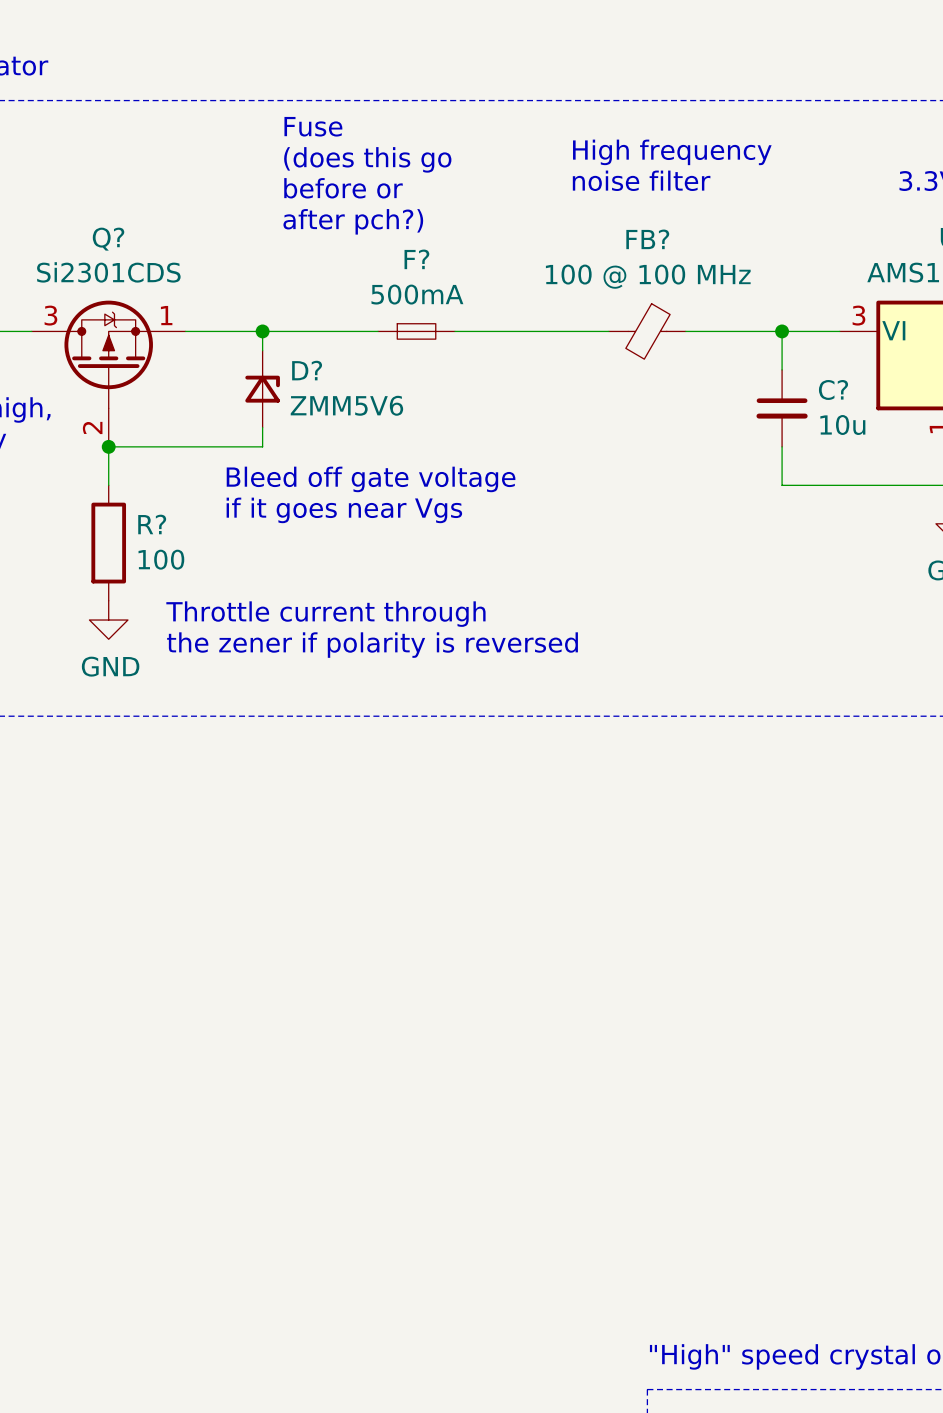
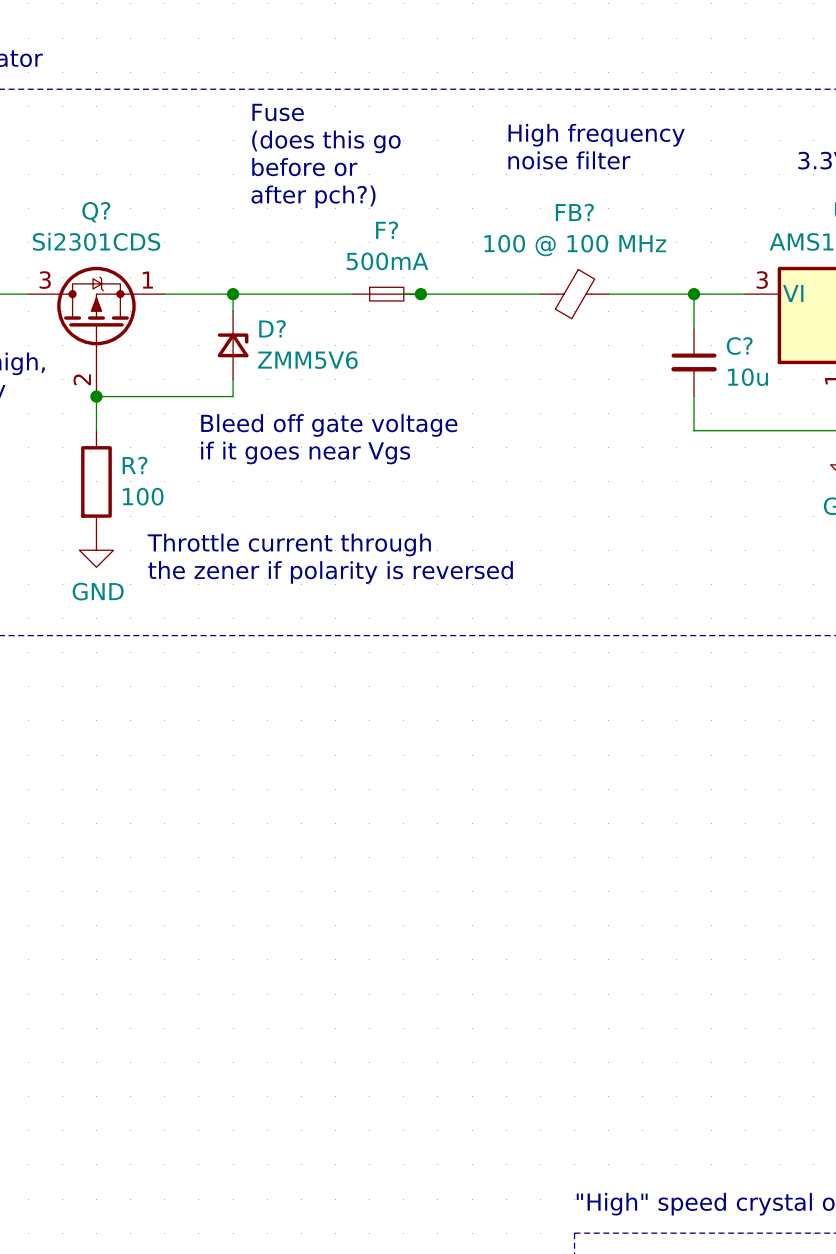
F? position: (416, 331) -> (386, 294)
junction: none -> (420, 294)

